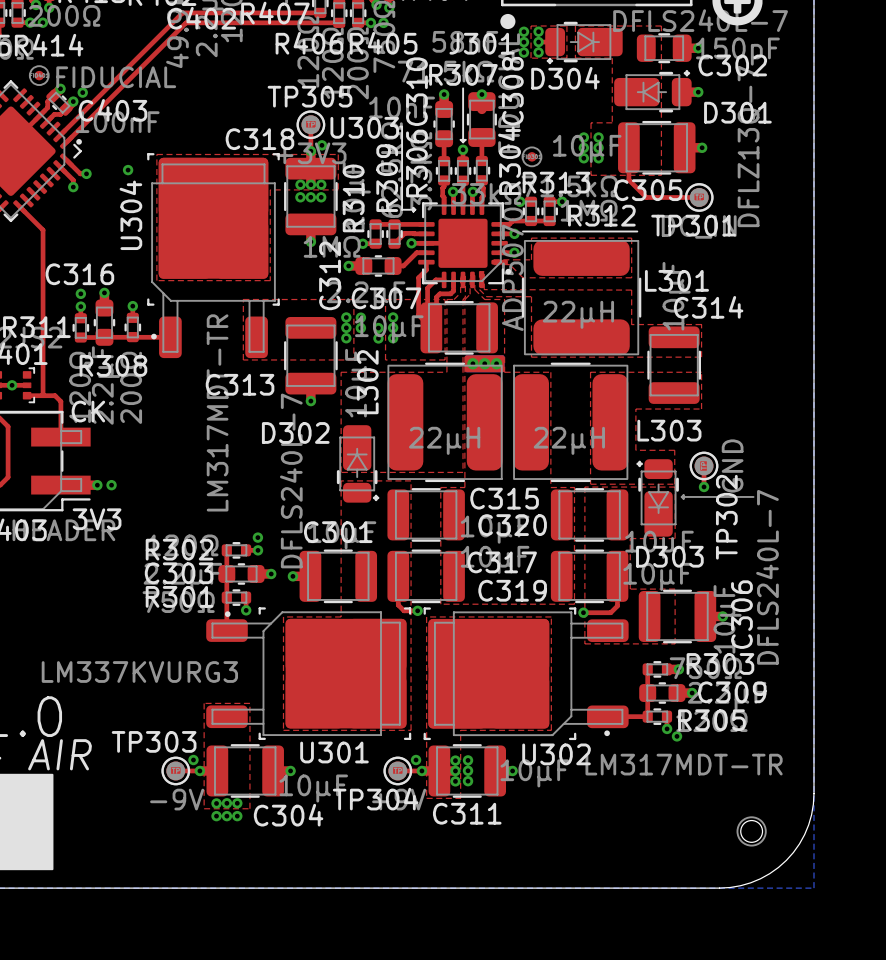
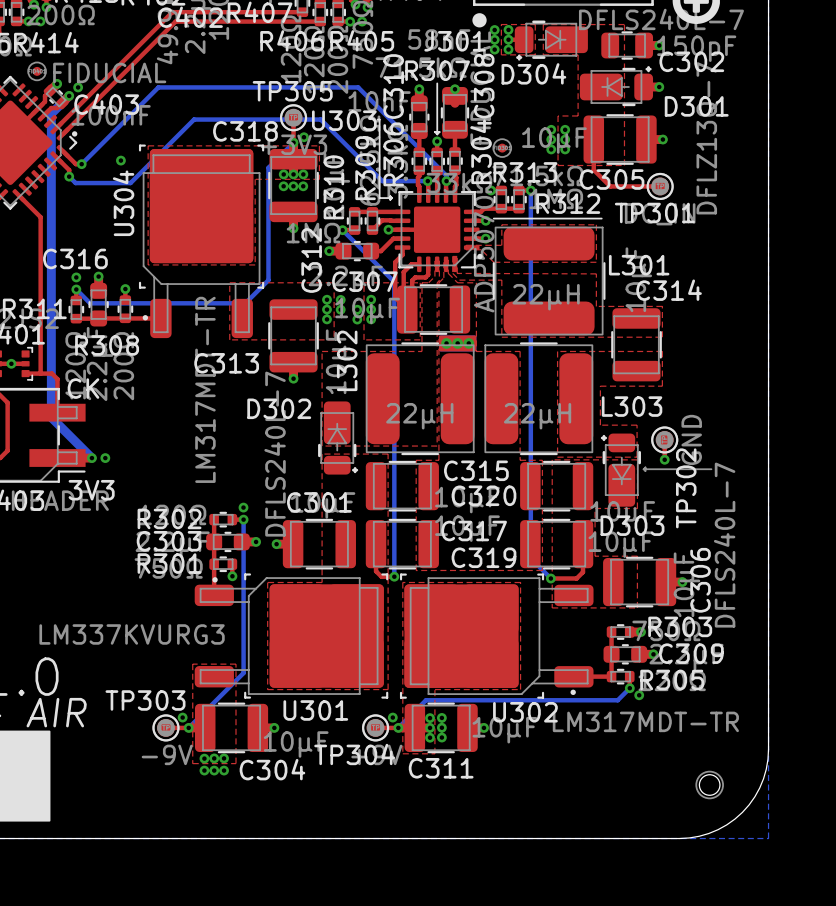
bottom track: none -> (69, 95) (51, 113) (51, 417) (91, 458)
bottom track: none -> (293, 142) (268, 167) (268, 280) (245, 303) (90, 303) (76, 289)
bottom track: none -> (81, 164) (158, 87) (358, 87) (446, 175) (446, 181)
bottom track: none -> (69, 176) (75, 183) (130, 183) (194, 119) (320, 119) (382, 181) (427, 181)
bottom track: none -> (530, 190) (530, 558) (550, 578)
bottom track: none -> (342, 230) (394, 281) (394, 576)
bottom track: none -> (243, 519) (243, 673) (188, 727)
bottom track: none -> (629, 688) (617, 700) (426, 700) (398, 727)

